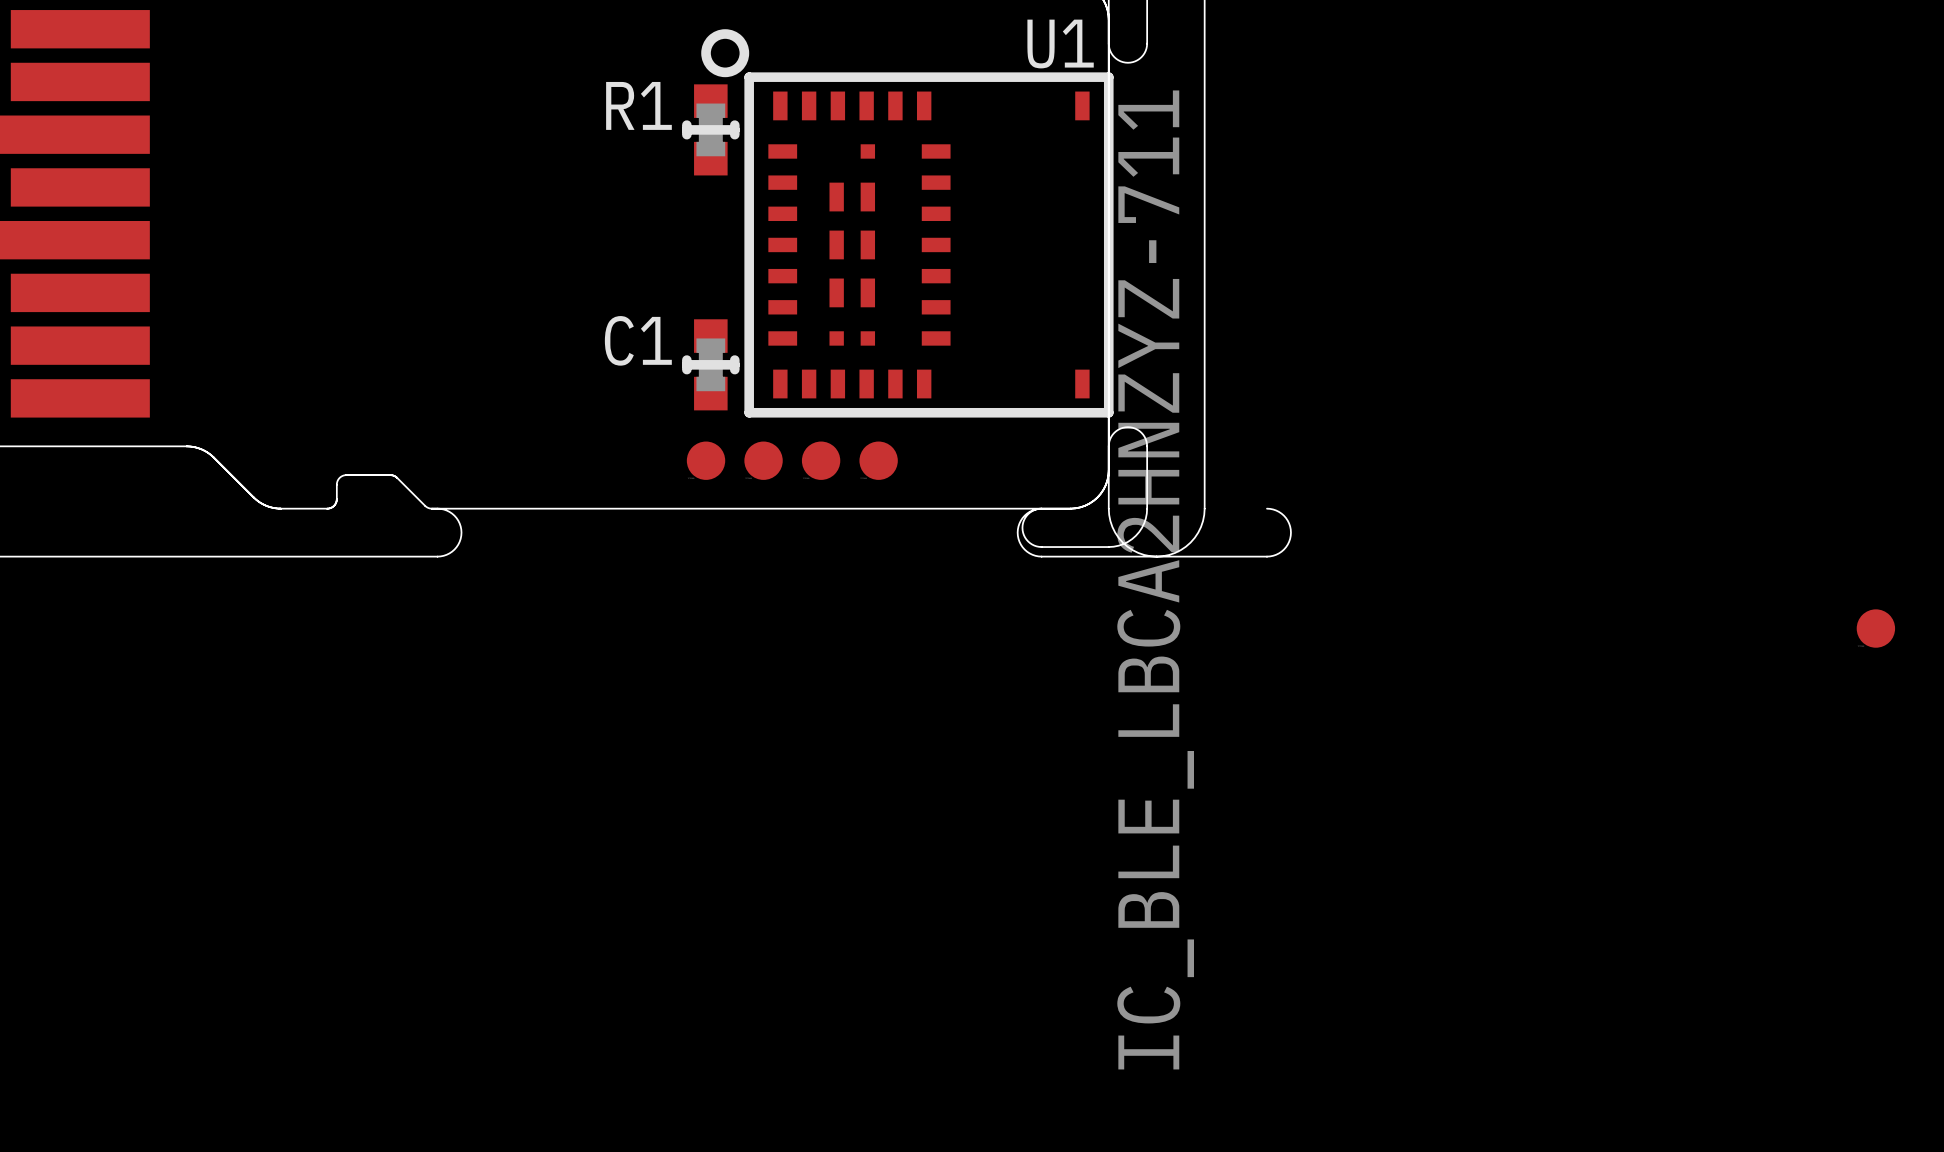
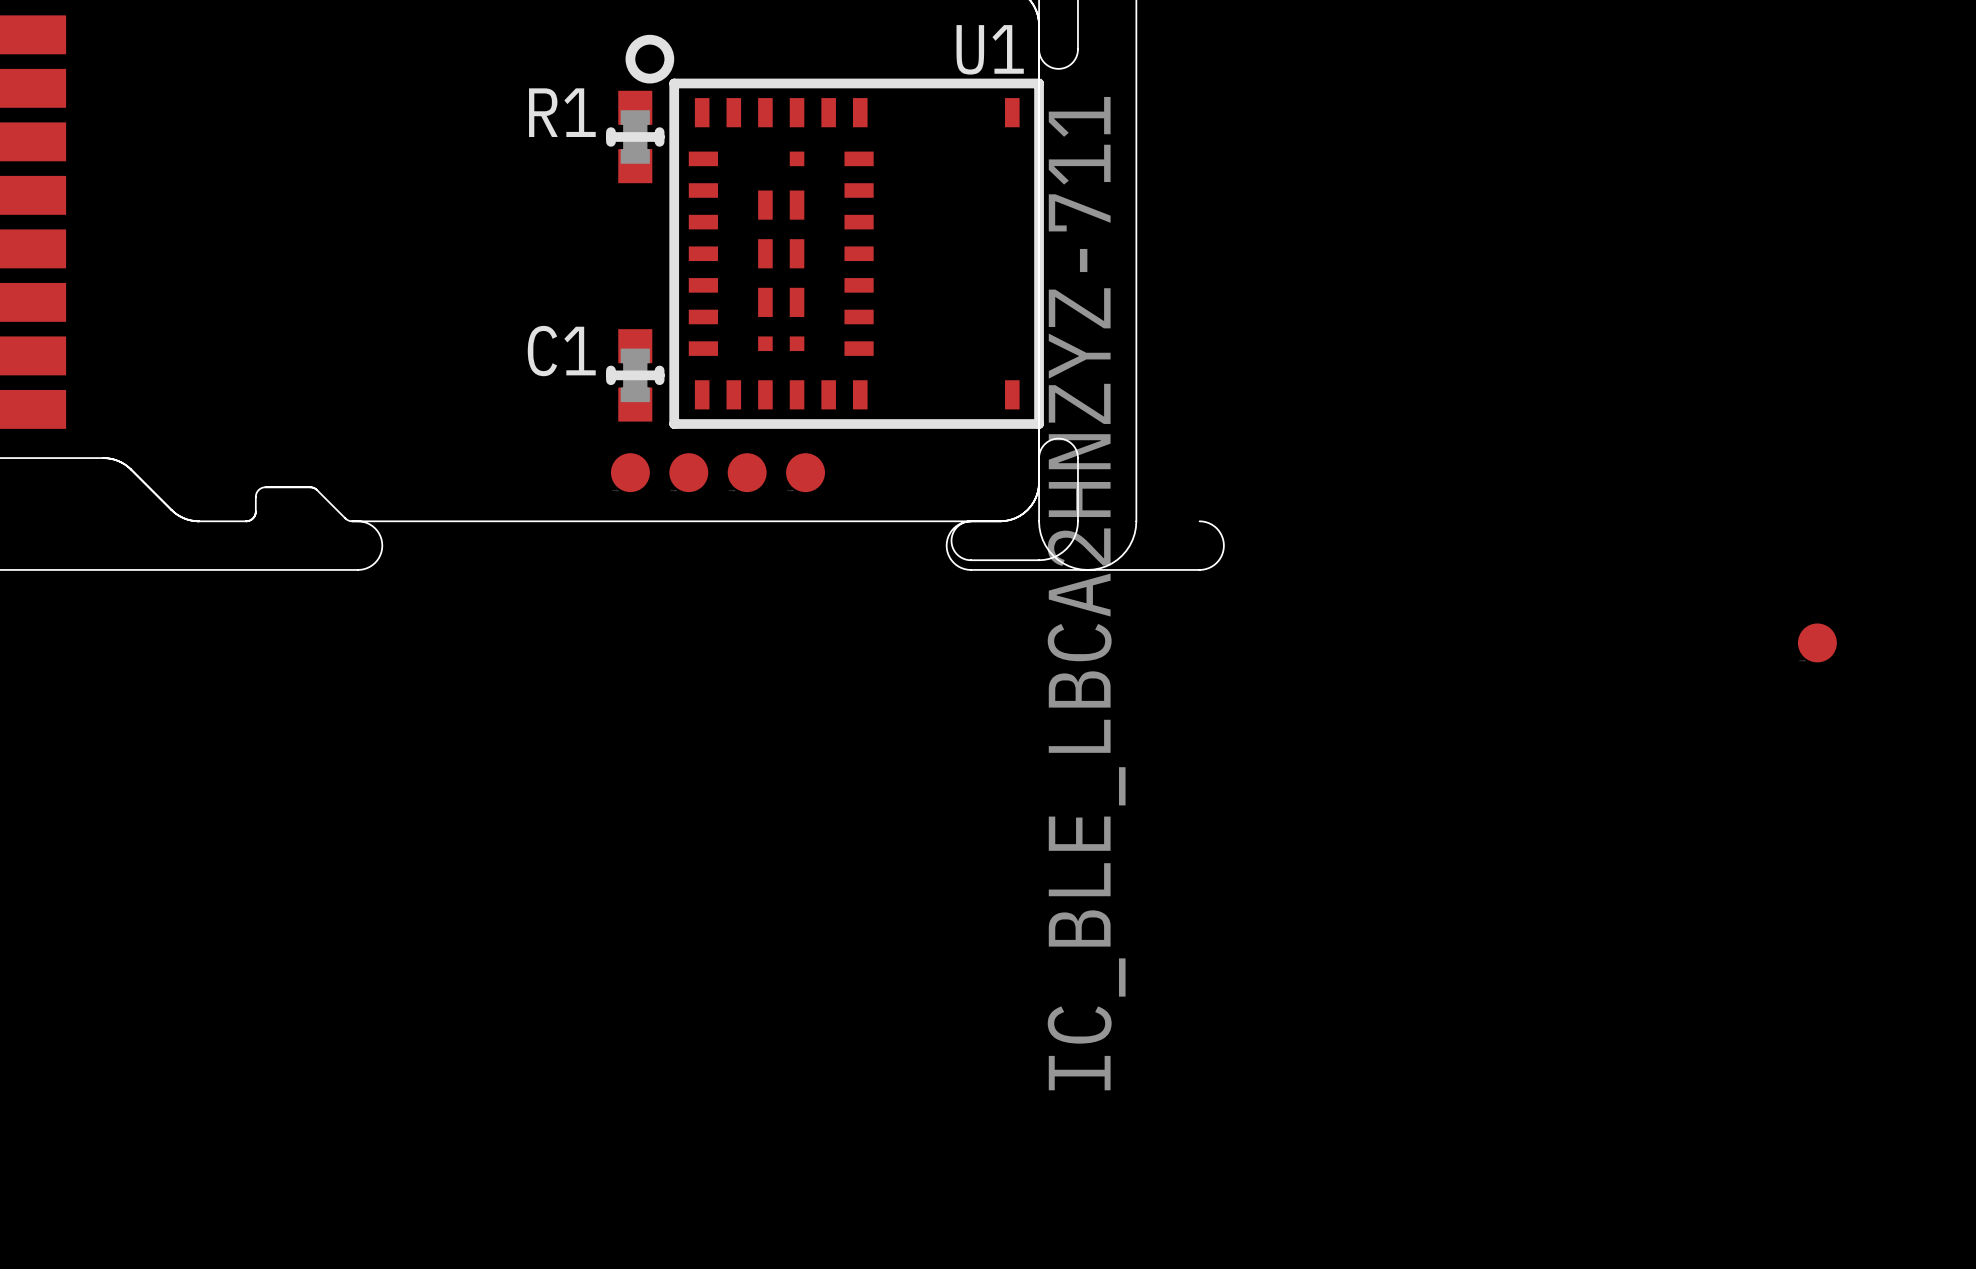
U1 footprint: [701, 29, 1114, 418] -> [625, 34, 1044, 429]

